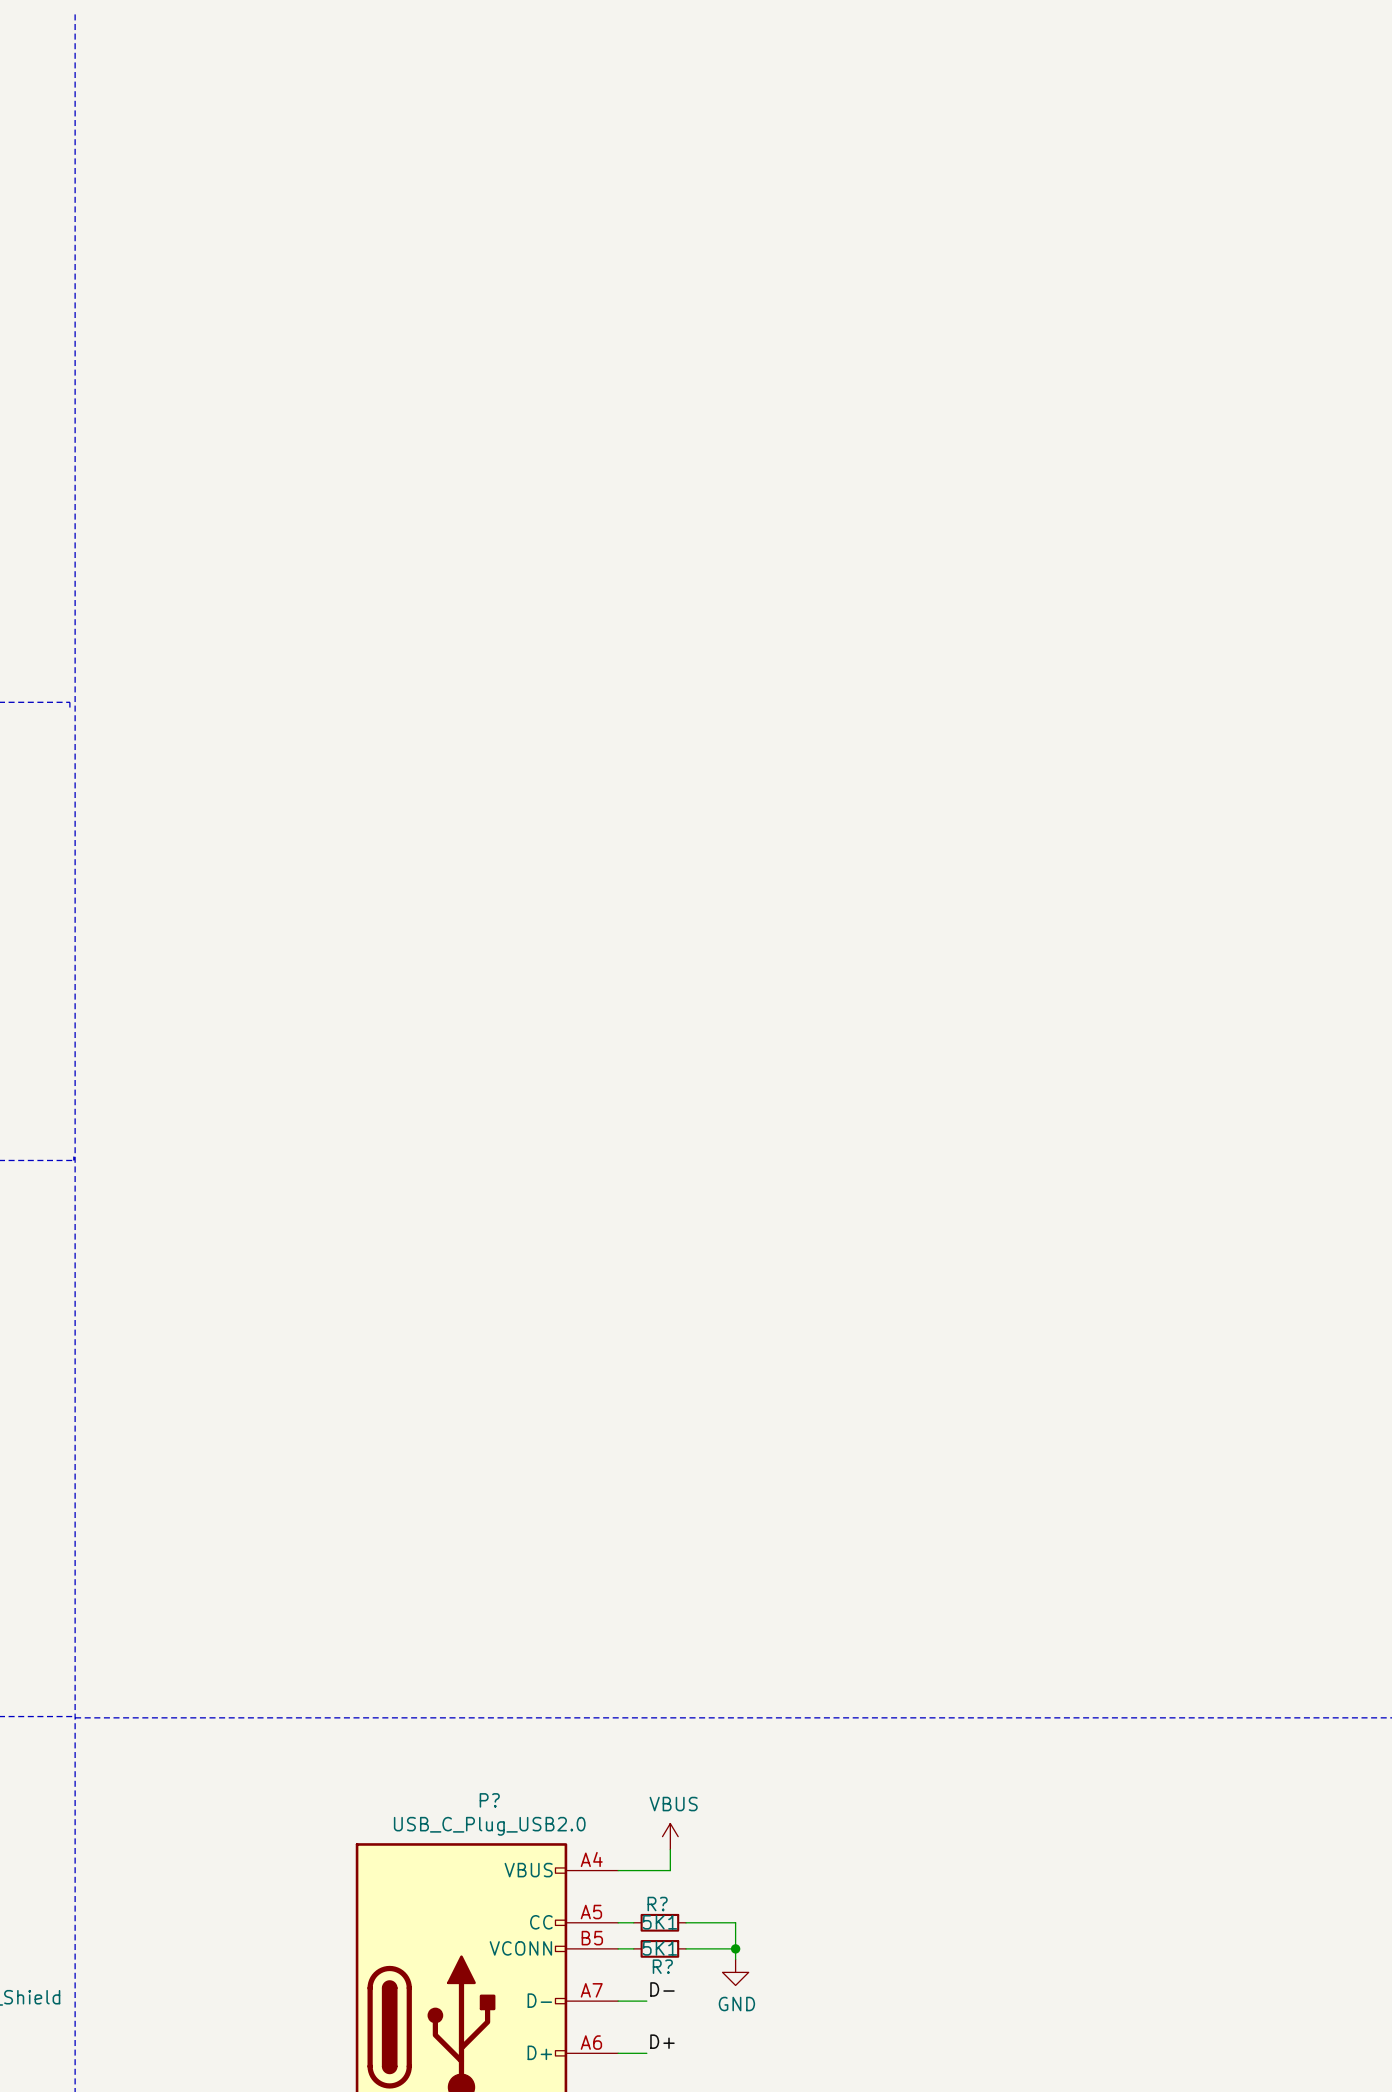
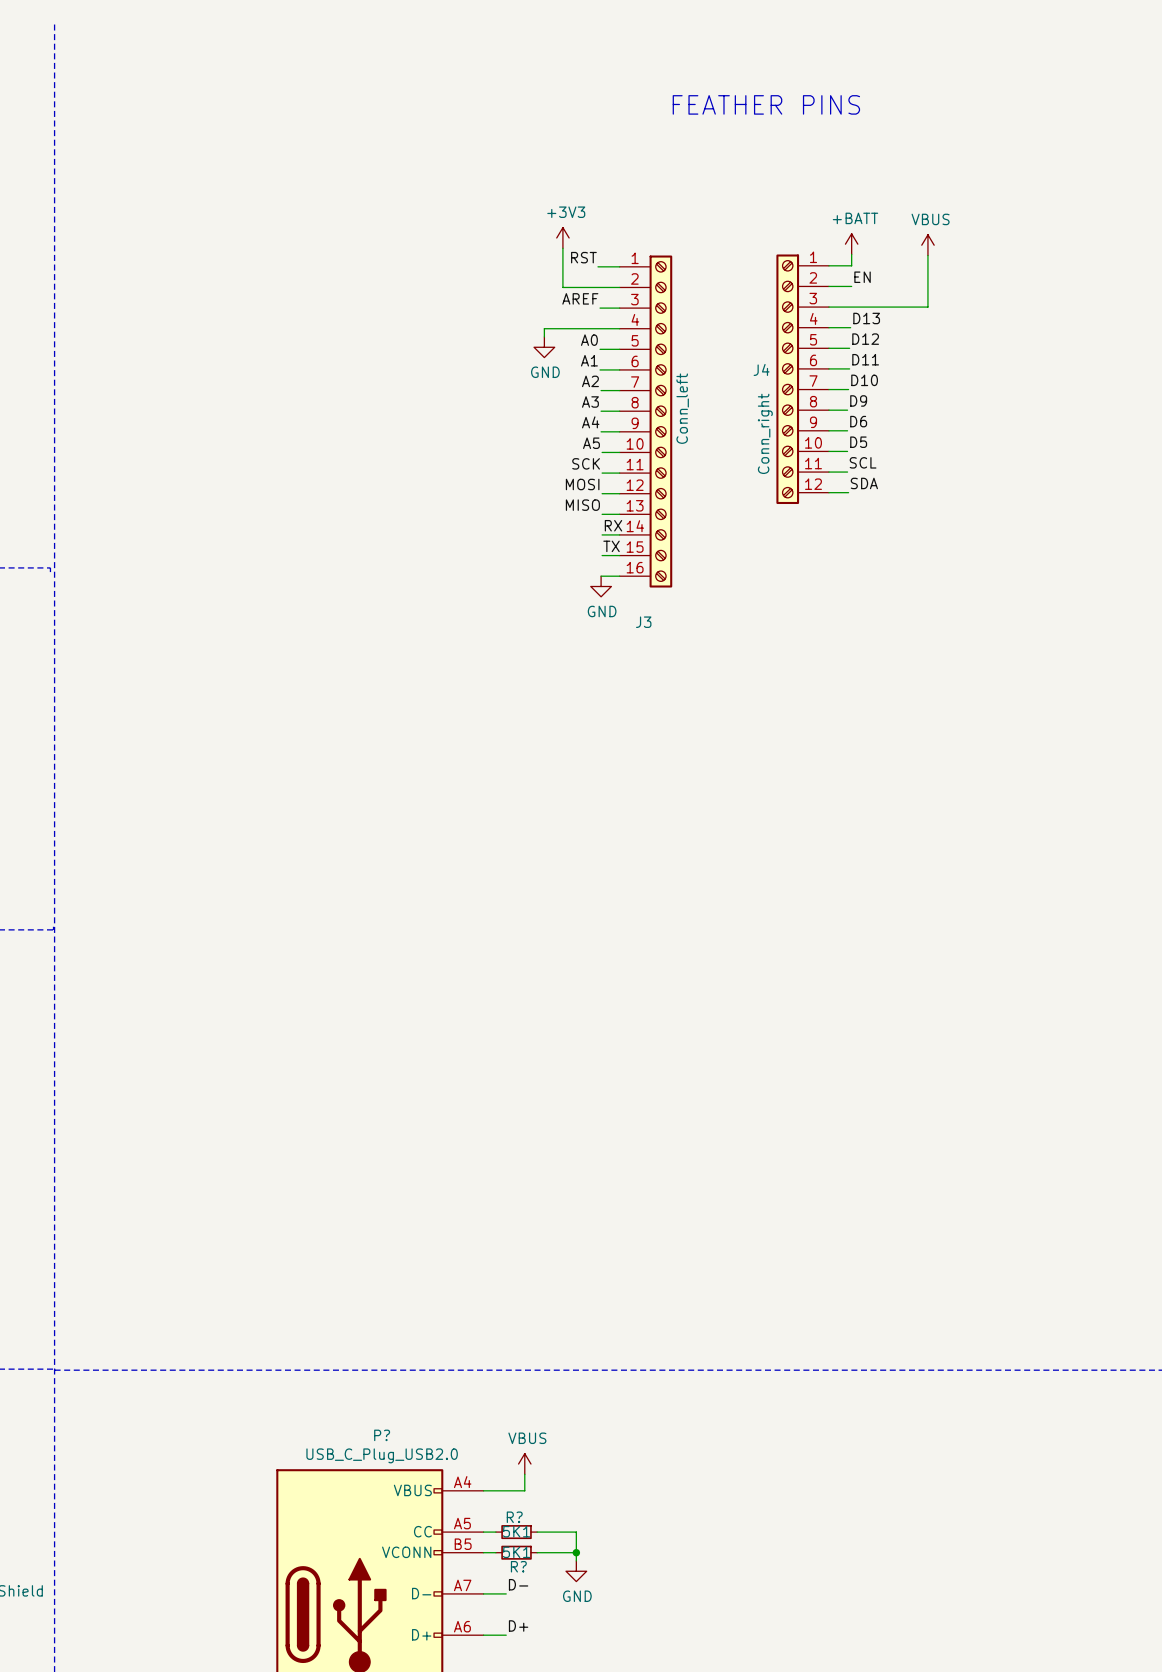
text: none -> FEATHER PINS (766, 104)
power symbol: none -> +3V3 (562, 237)
power symbol: none -> +BATT (851, 244)
power symbol: none -> VBUS (927, 245)
wire: none -> (562, 248) (562, 287) (619, 287)
wire: none -> (851, 254) (851, 265) (828, 265)
wire: none -> (927, 255) (927, 307) (828, 307)
label: none -> RST (583, 257)
wire: none -> (597, 266) (619, 266)
label: none -> EN (862, 277)
wire: none -> (828, 286) (851, 286)
label: none -> AREF (580, 298)
wire: none -> (600, 308) (619, 308)
label: none -> D13 (866, 318)
wire: none -> (828, 327) (850, 327)
wire: none -> (619, 328) (544, 328) (544, 336)
label: none -> D12 (865, 339)
label: none -> A0 (589, 340)
power symbol: none -> GND (544, 347)
wire: none -> (828, 348) (849, 348)
wire: none -> (600, 349) (619, 349)
label: none -> D11 (865, 359)
label: none -> A1 (589, 360)
wire: none -> (828, 368) (849, 368)
wire: none -> (600, 369) (619, 369)
J4: none -> Conn_right (802, 379)
label: none -> D10 (864, 380)
label: none -> A2 (590, 381)
wire: none -> (828, 389) (848, 389)
wire: none -> (601, 390) (619, 390)
label: none -> D9 (858, 400)
label: none -> A3 (590, 402)
wire: none -> (828, 410) (847, 410)
wire: none -> (601, 411) (619, 411)
J3: none -> Conn_left (645, 421)
label: none -> D6 (858, 421)
label: none -> A4 (590, 422)
wire: none -> (828, 430) (847, 430)
wire: none -> (601, 431) (619, 431)
label: none -> D5 (858, 442)
label: none -> A5 (591, 443)
wire: none -> (828, 451) (847, 451)
wire: none -> (602, 452) (619, 452)
label: none -> SCL (863, 462)
label: none -> SCK (586, 463)
wire: none -> (828, 472) (847, 472)
wire: none -> (602, 473) (619, 473)
label: none -> SDA (864, 483)
label: none -> MOSI (582, 484)
wire: none -> (828, 492) (848, 492)
wire: none -> (602, 493) (619, 493)
label: none -> MISO (582, 505)
wire: none -> (602, 514) (619, 514)
label: none -> RX (613, 525)
wire: none -> (602, 534) (619, 534)
label: none -> TX (611, 546)
wire: none -> (602, 555) (619, 555)
wire: none -> (601, 576) (619, 576)
power symbol: none -> GND (601, 586)

